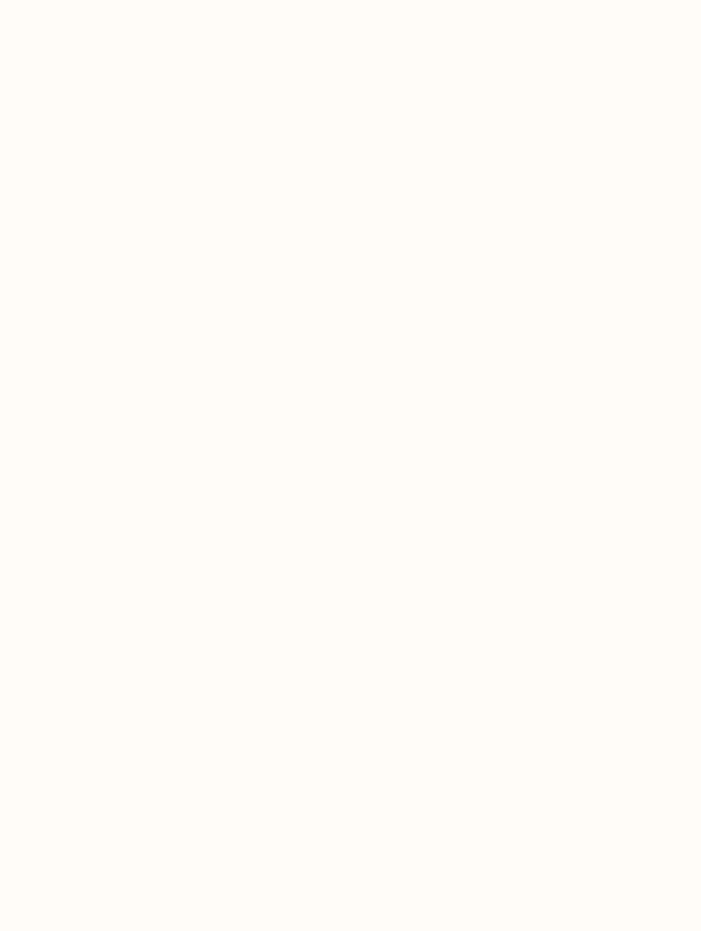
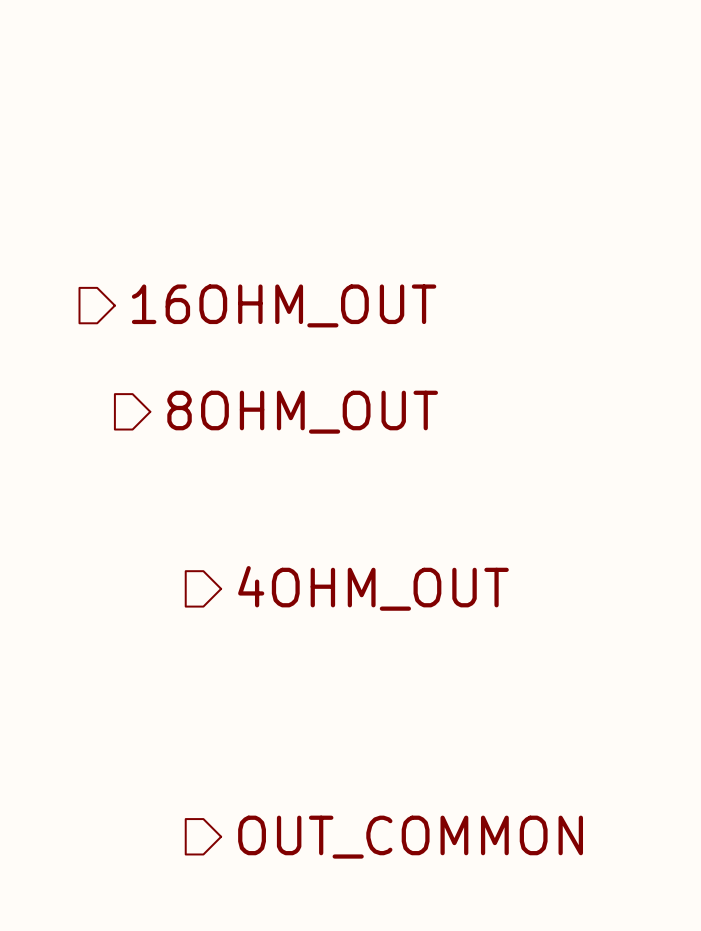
hierarchical label: none -> 16OHM_OUT (284, 305)
hierarchical label: none -> 8OHM_OUT (302, 412)
hierarchical label: none -> 4OHM_OUT (373, 588)
hierarchical label: none -> OUT_COMMON (410, 837)

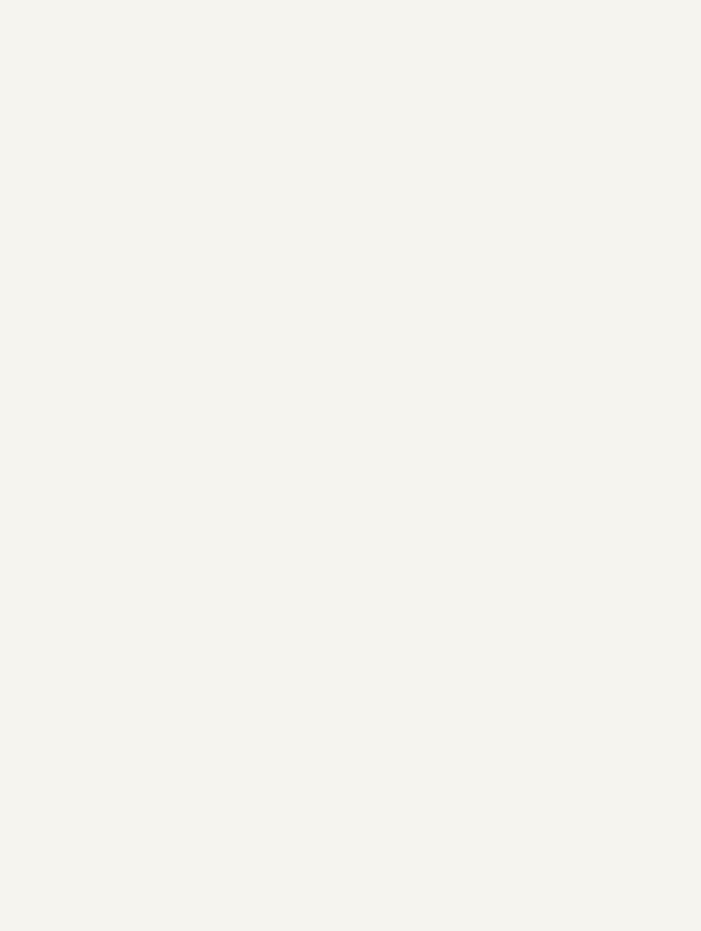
hierarchical label: 16OHM_OUT (284, 305) -> none
hierarchical label: 8OHM_OUT (302, 412) -> none
hierarchical label: 4OHM_OUT (373, 588) -> none
hierarchical label: OUT_COMMON (410, 837) -> none

